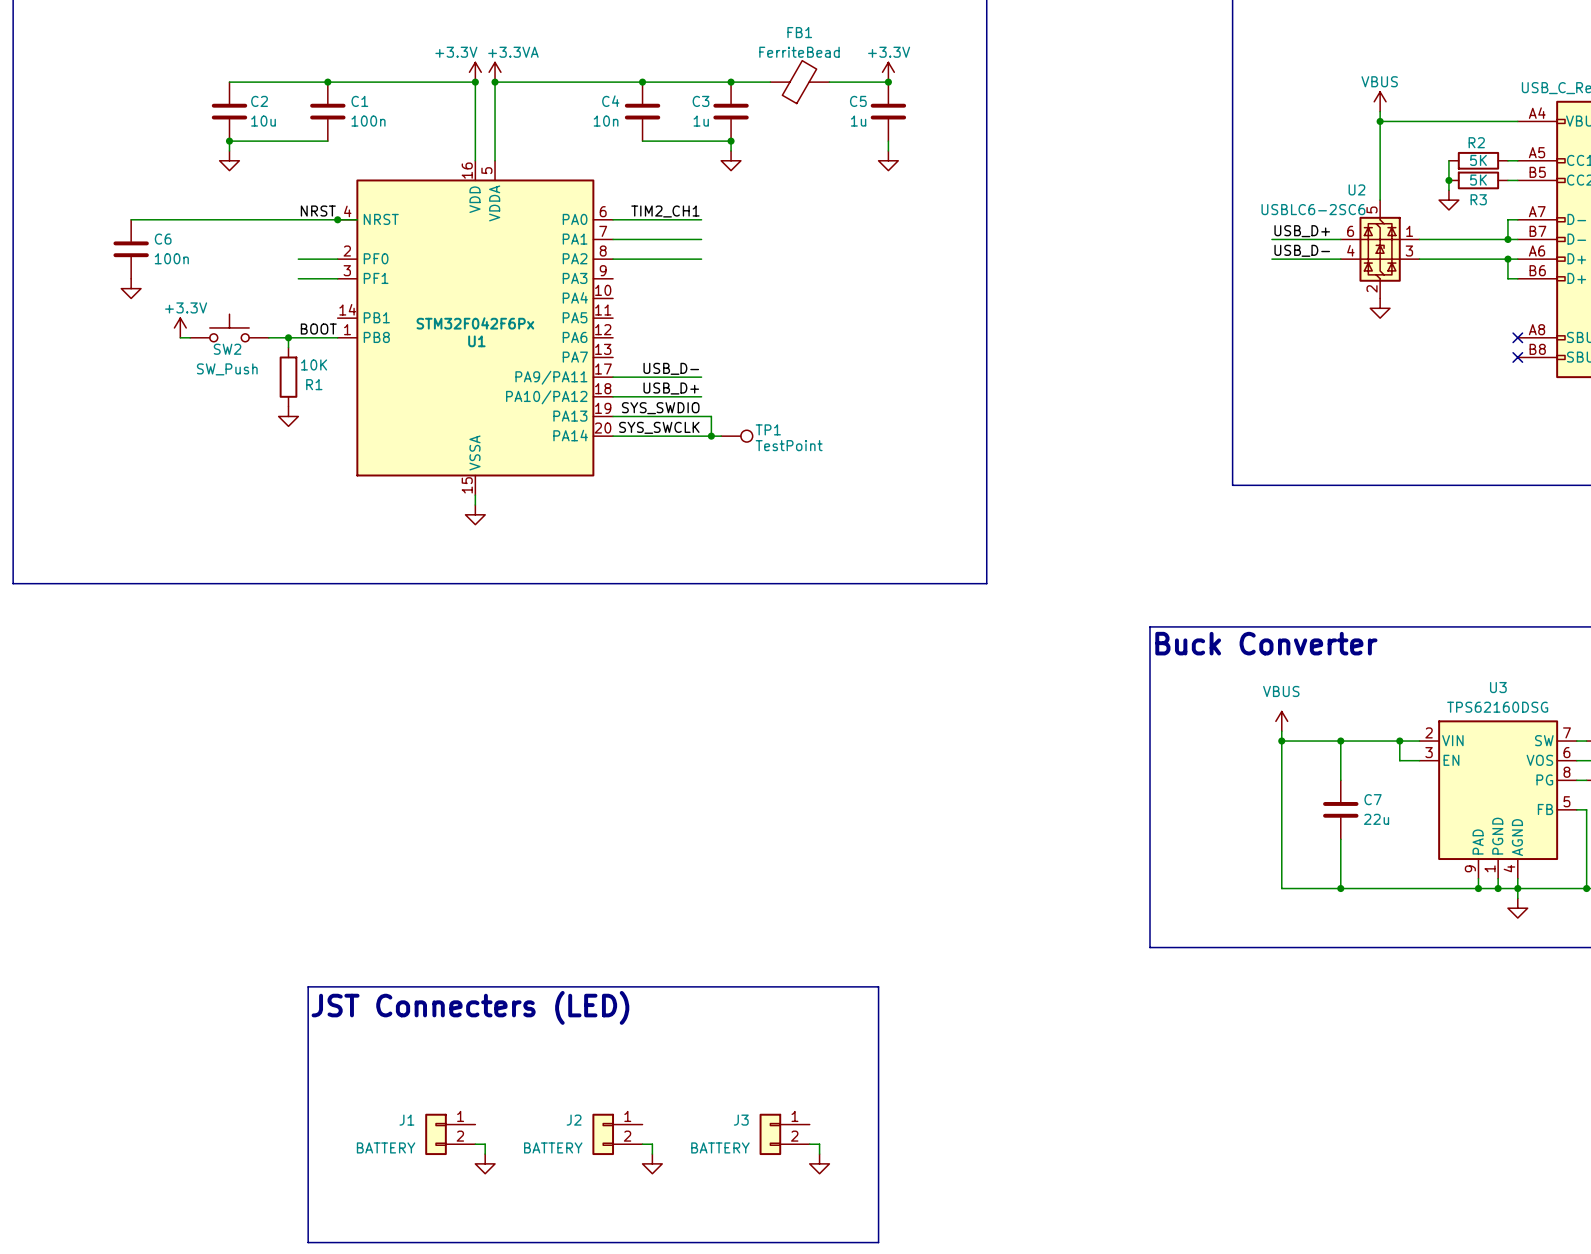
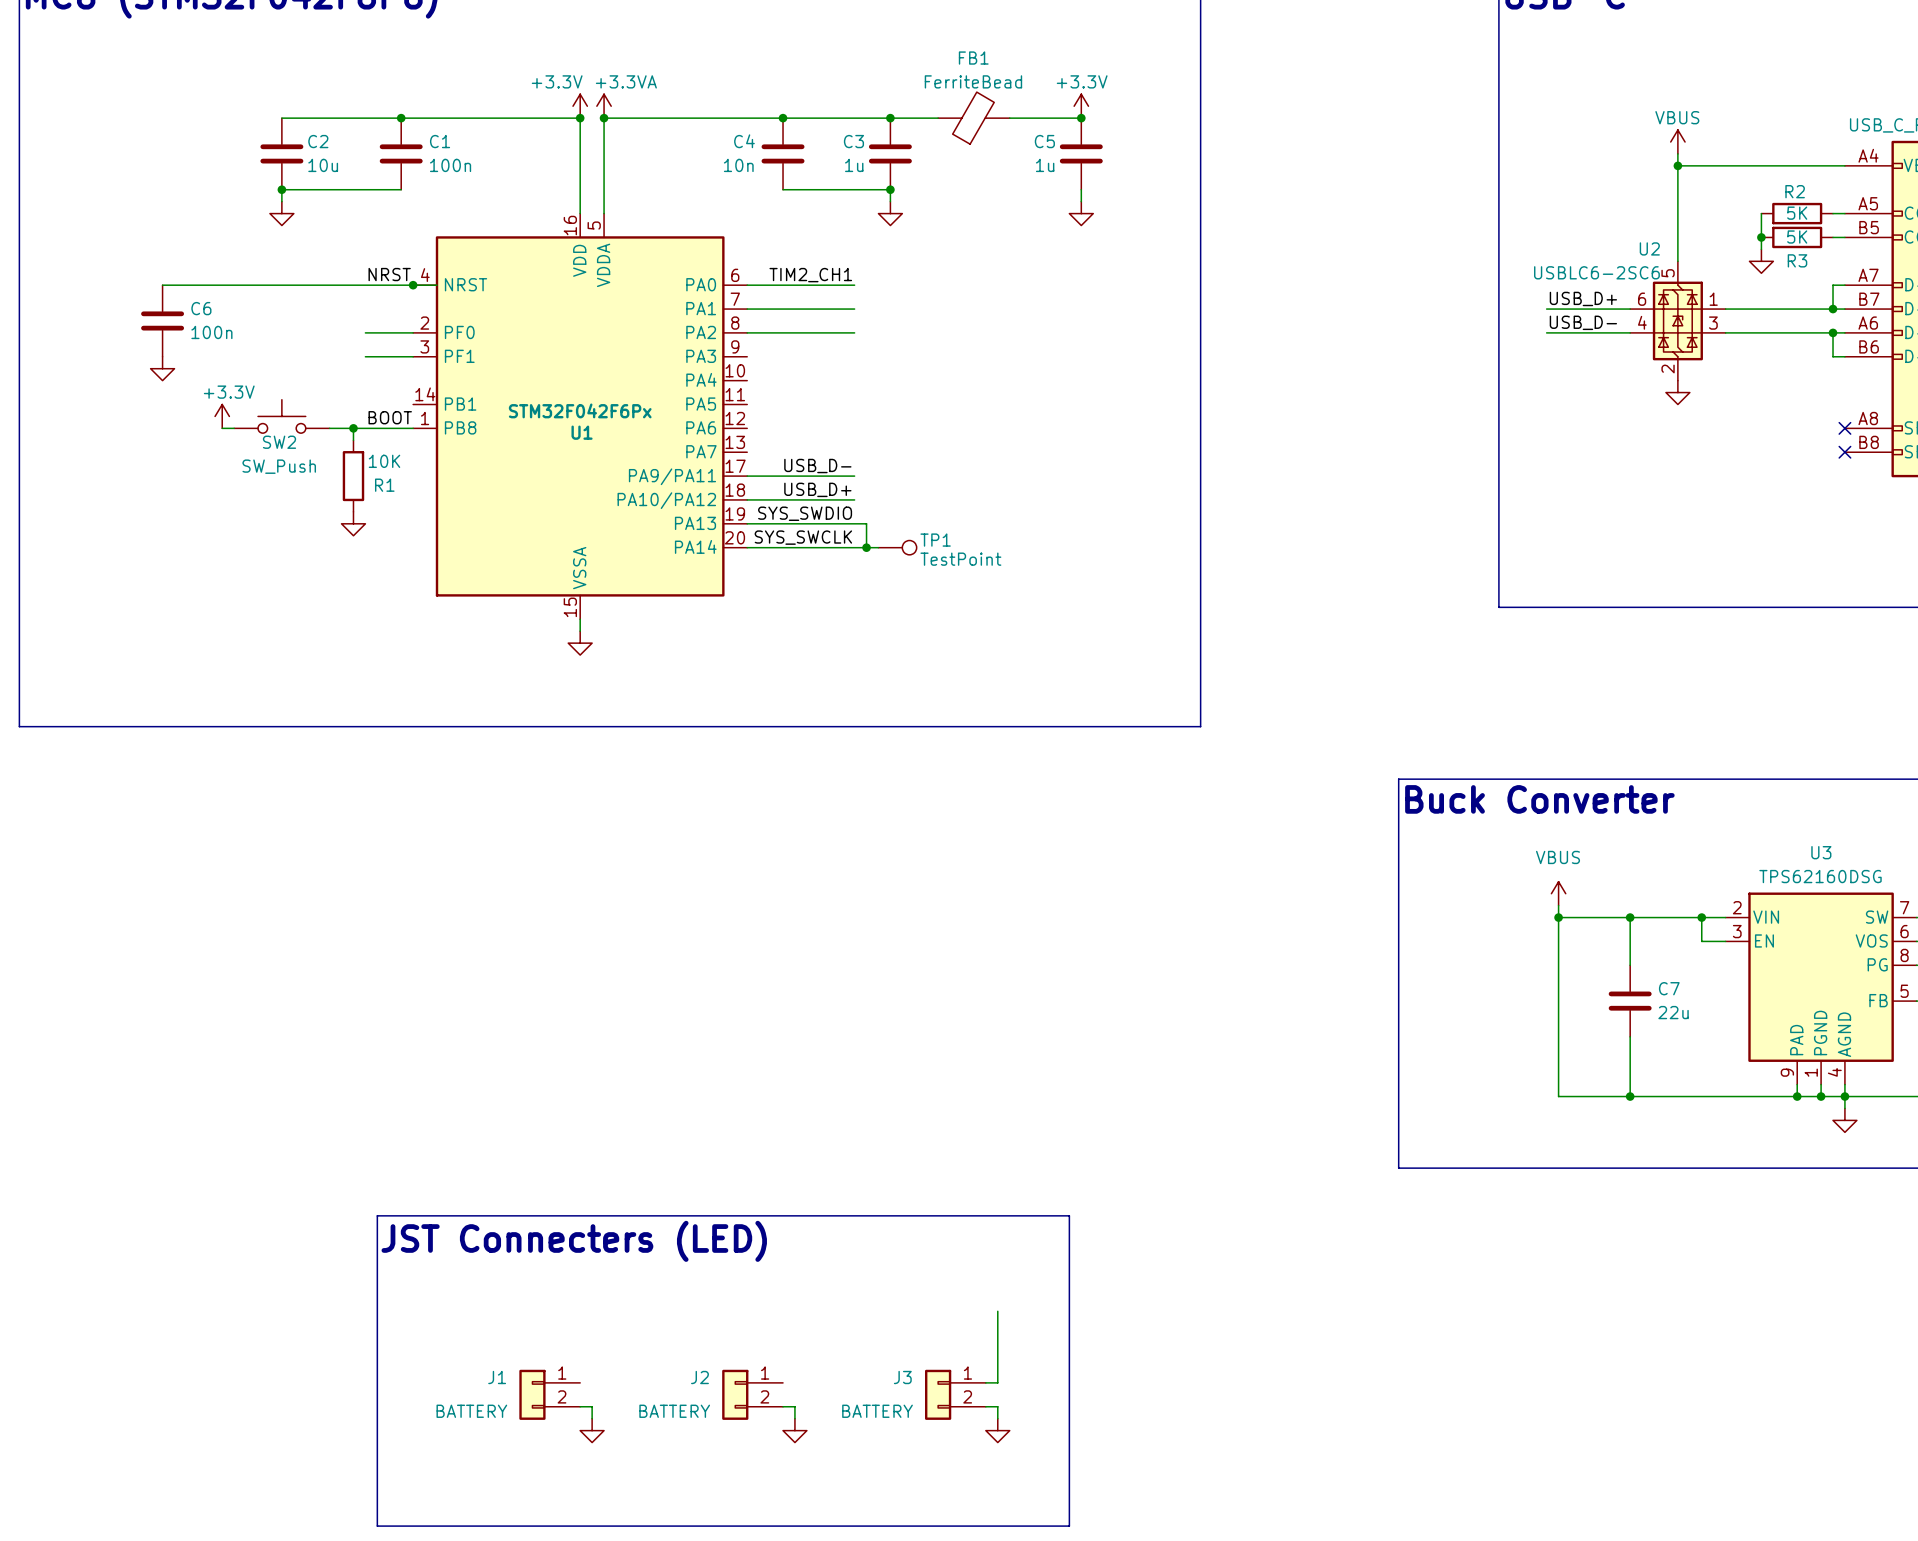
wire: none -> (997, 1311) (997, 1382) (985, 1382)

